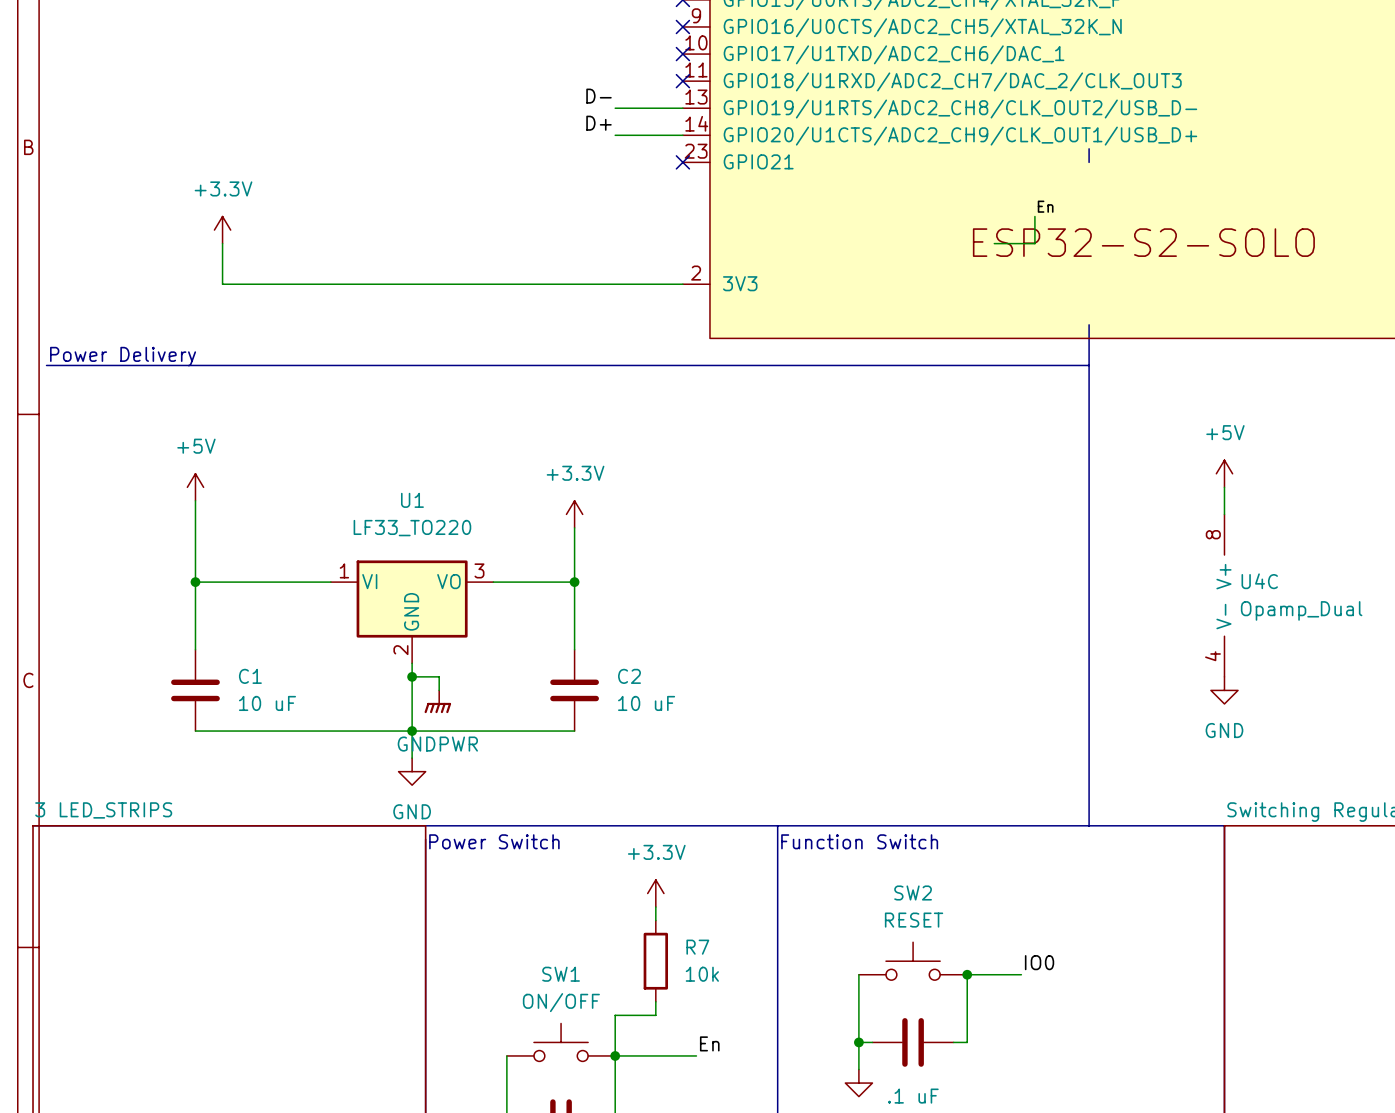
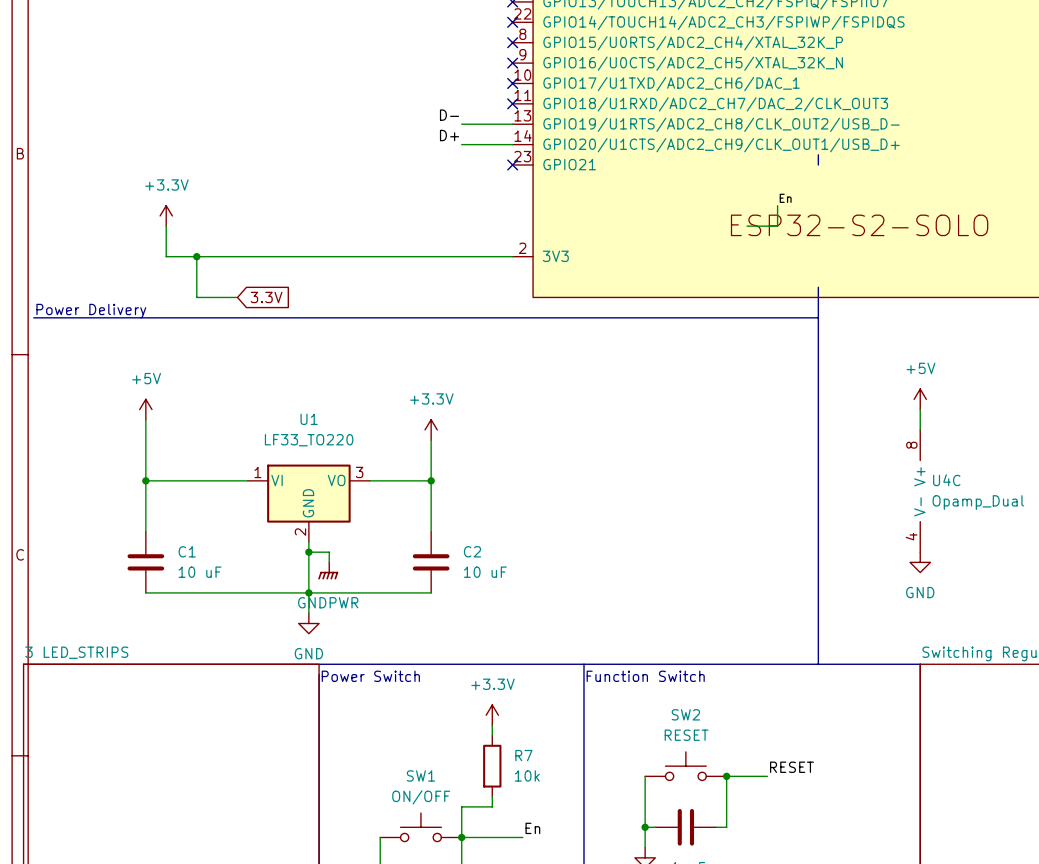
wire: none -> (196, 256) (196, 297) (237, 297)
junction: none -> (196, 256)
global label: none -> 3.3V (266, 297)
label: IO0 (1039, 962) -> RESET (791, 767)

